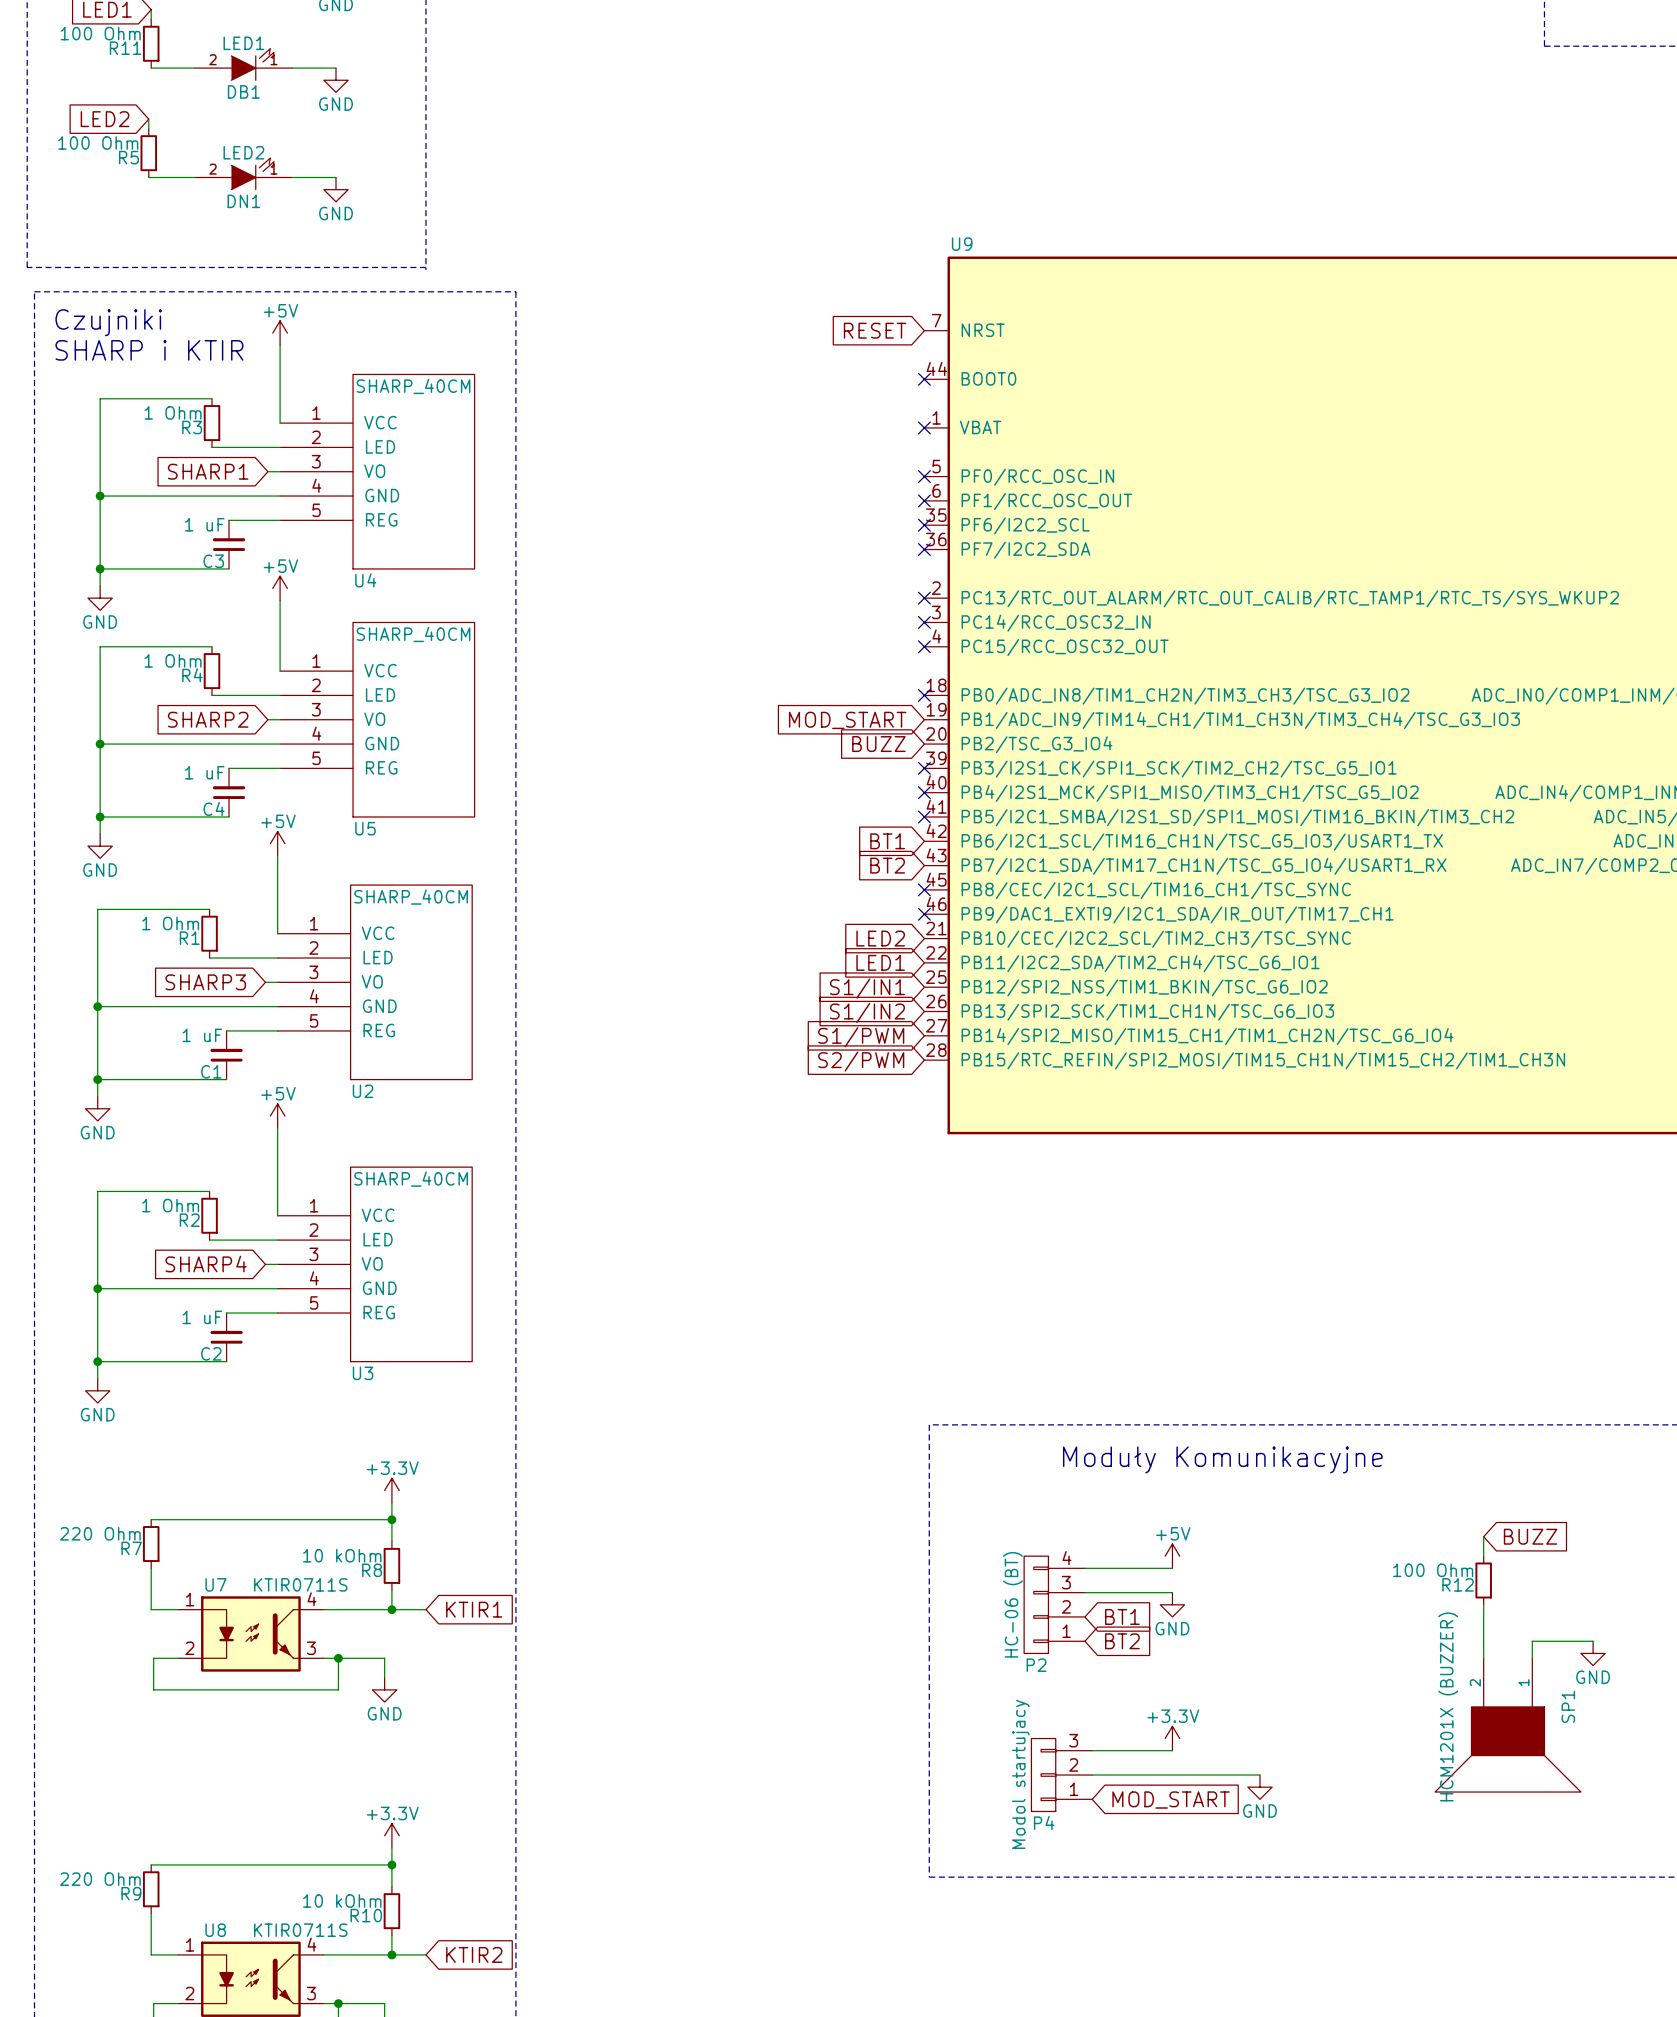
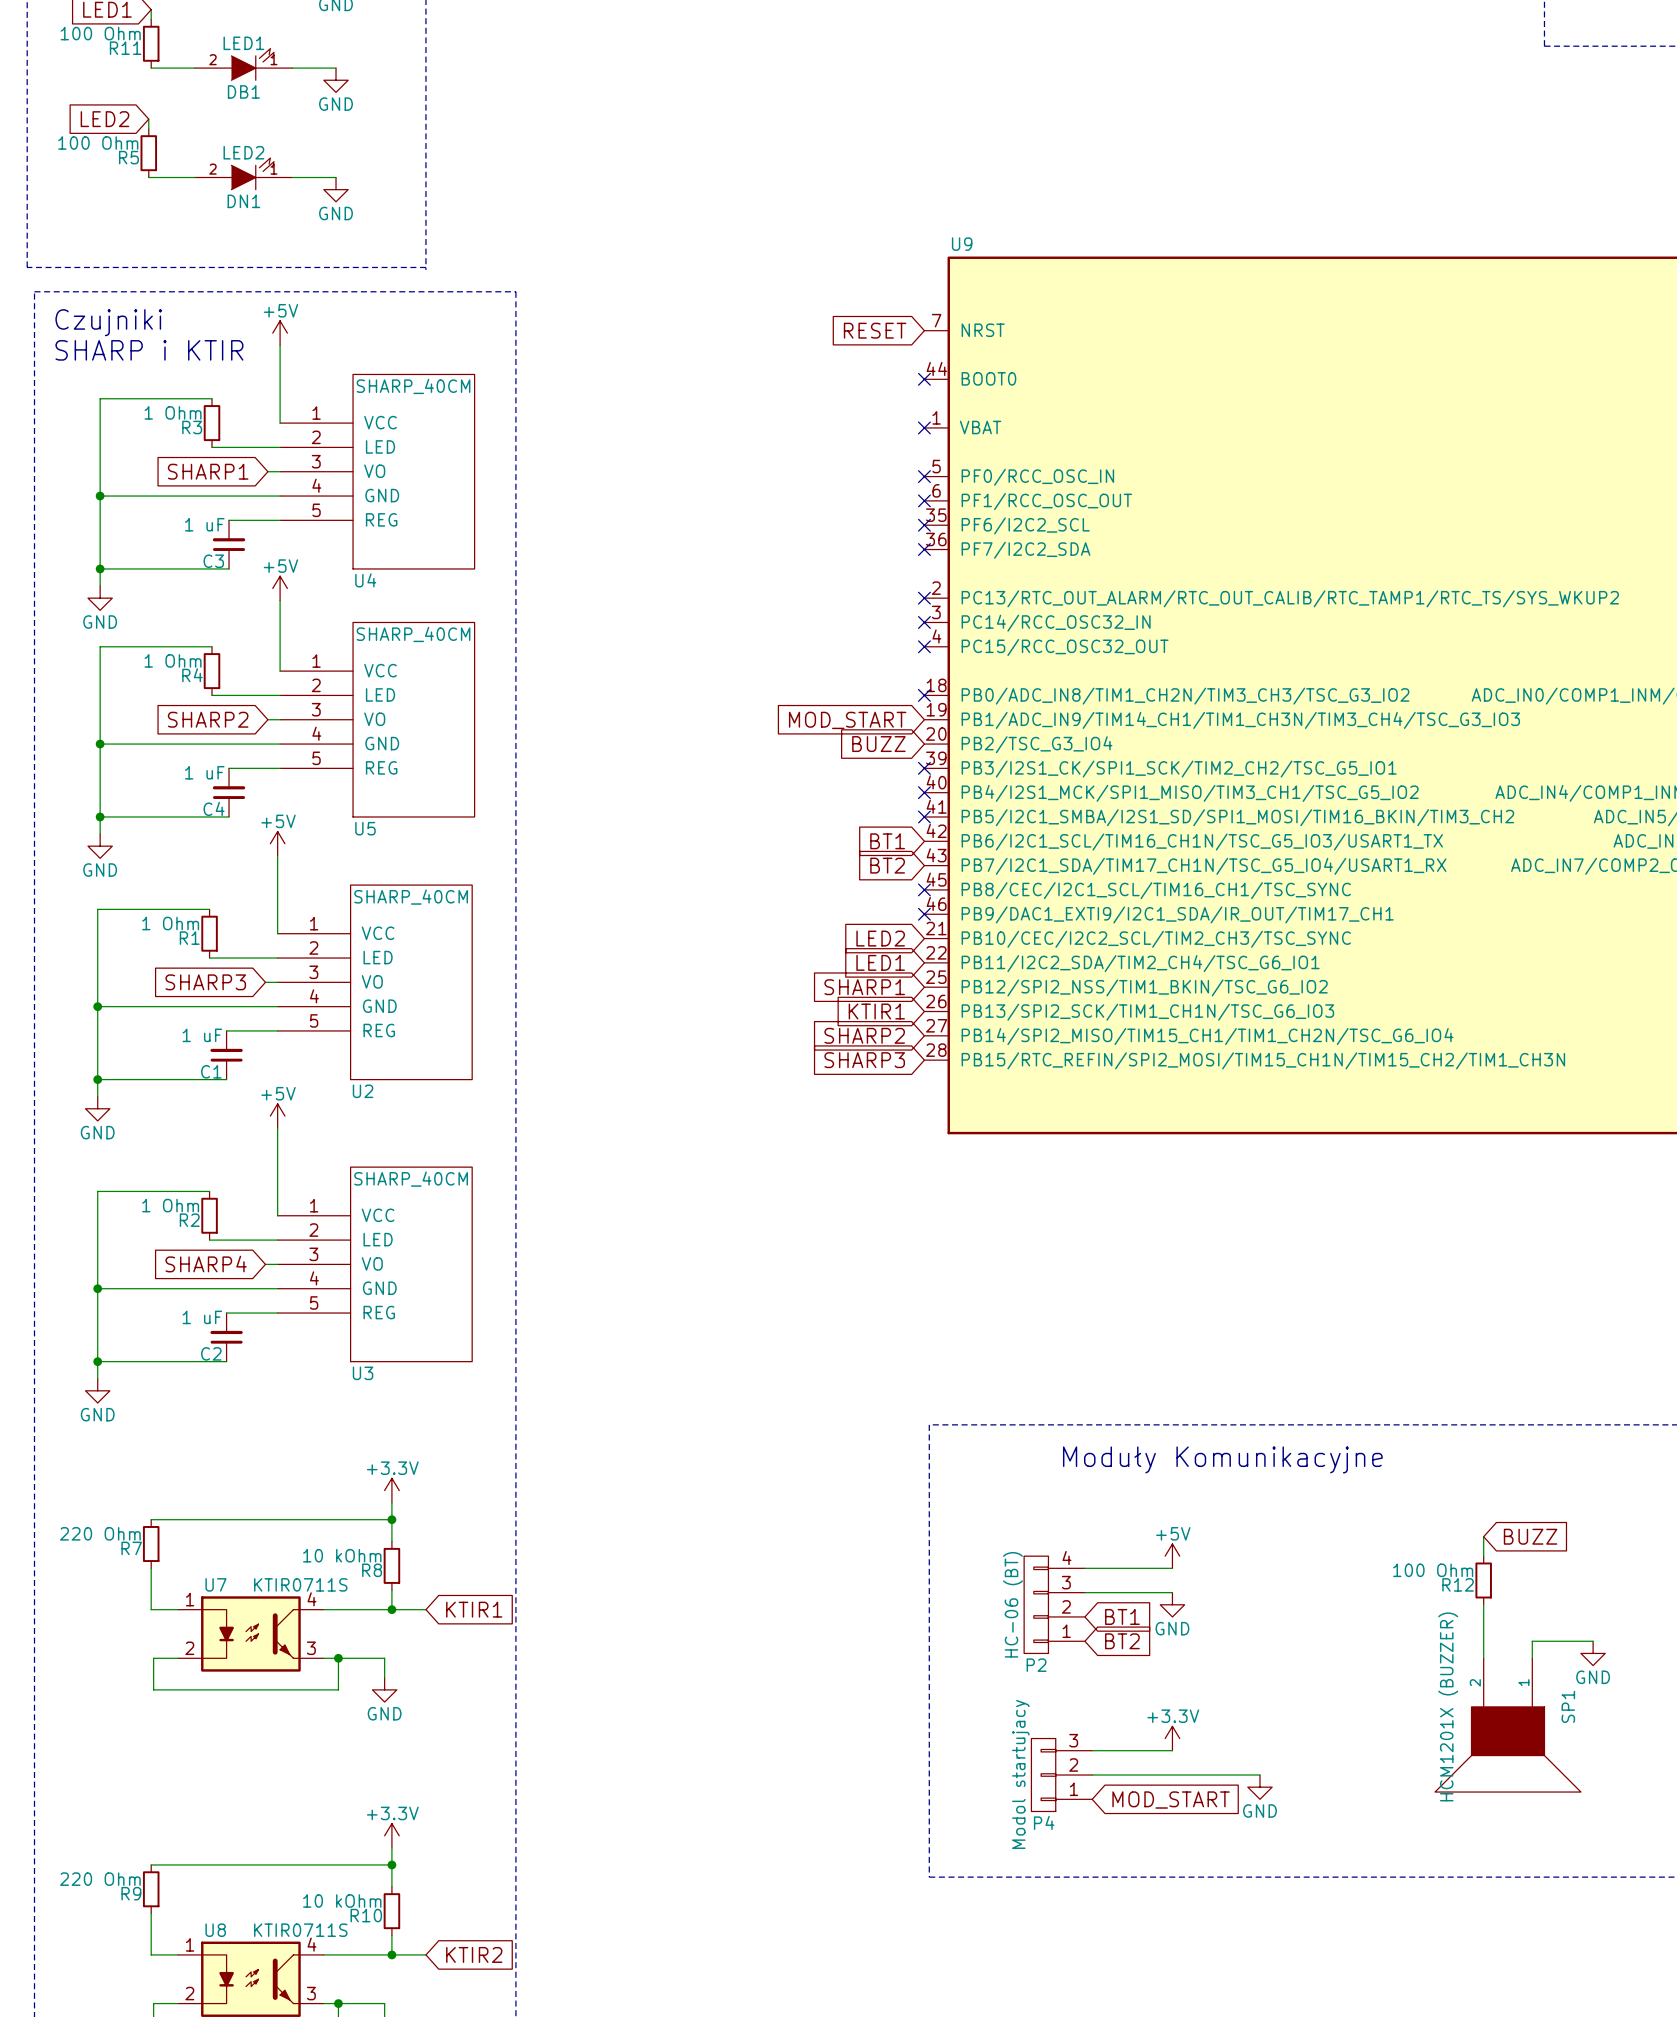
global label: S1/IN1 (867, 988) -> SHARP1 (864, 987)
global label: S1/IN2 (867, 1012) -> KTIR1 (876, 1011)
global label: S1/PWM (861, 1037) -> SHARP2 (864, 1035)
global label: S2/PWM (861, 1061) -> SHARP3 (864, 1060)

